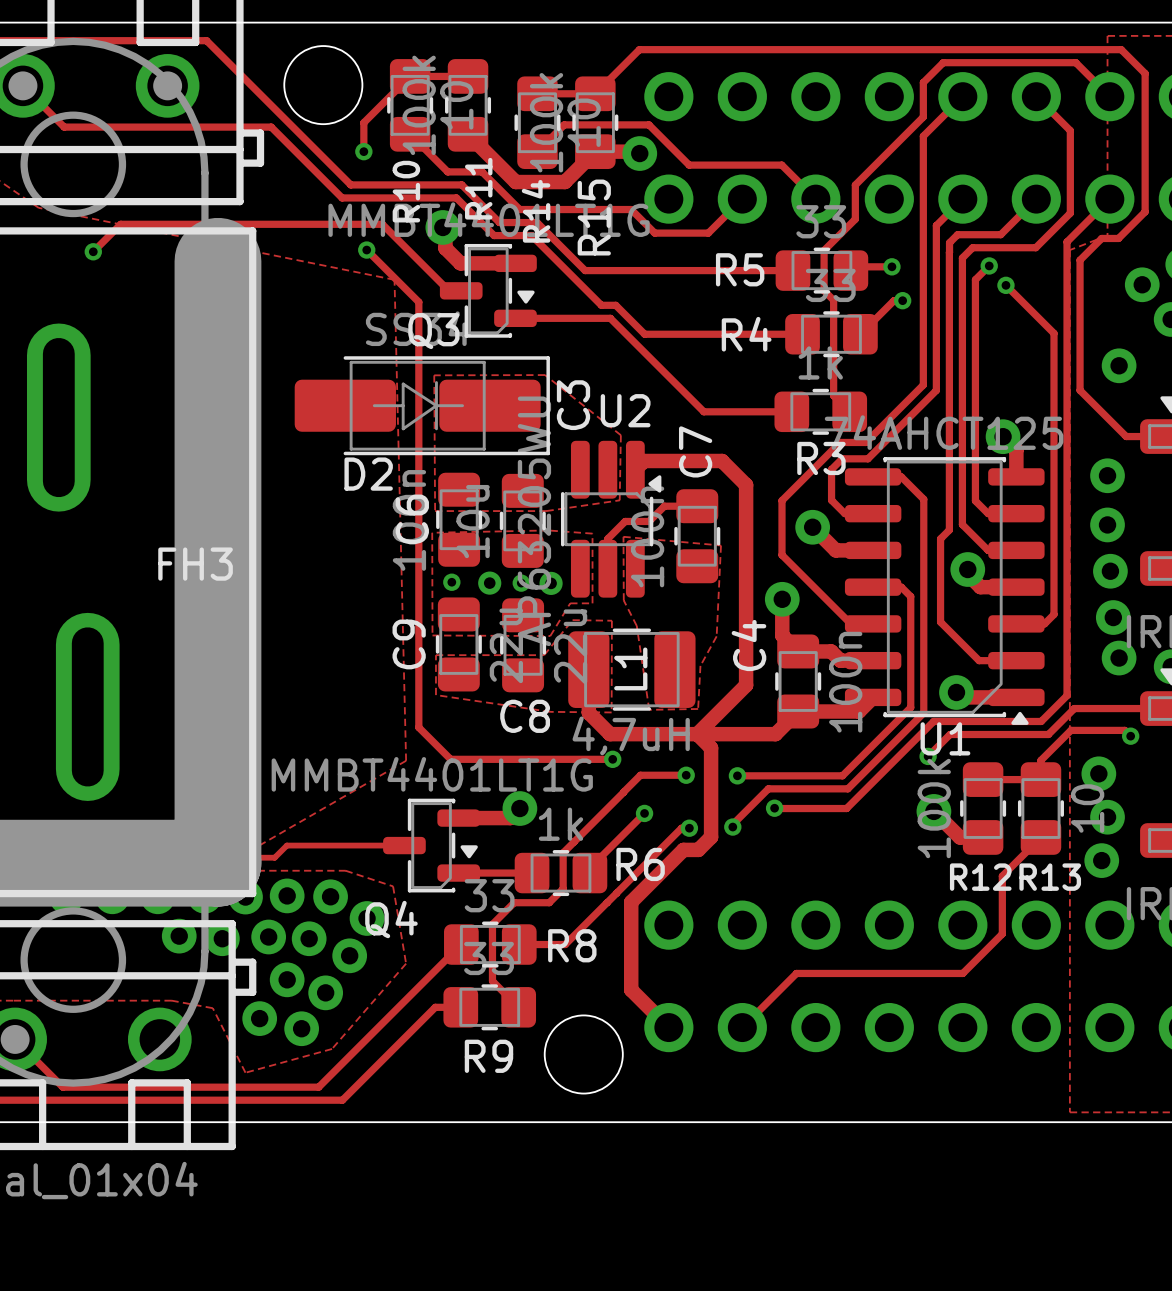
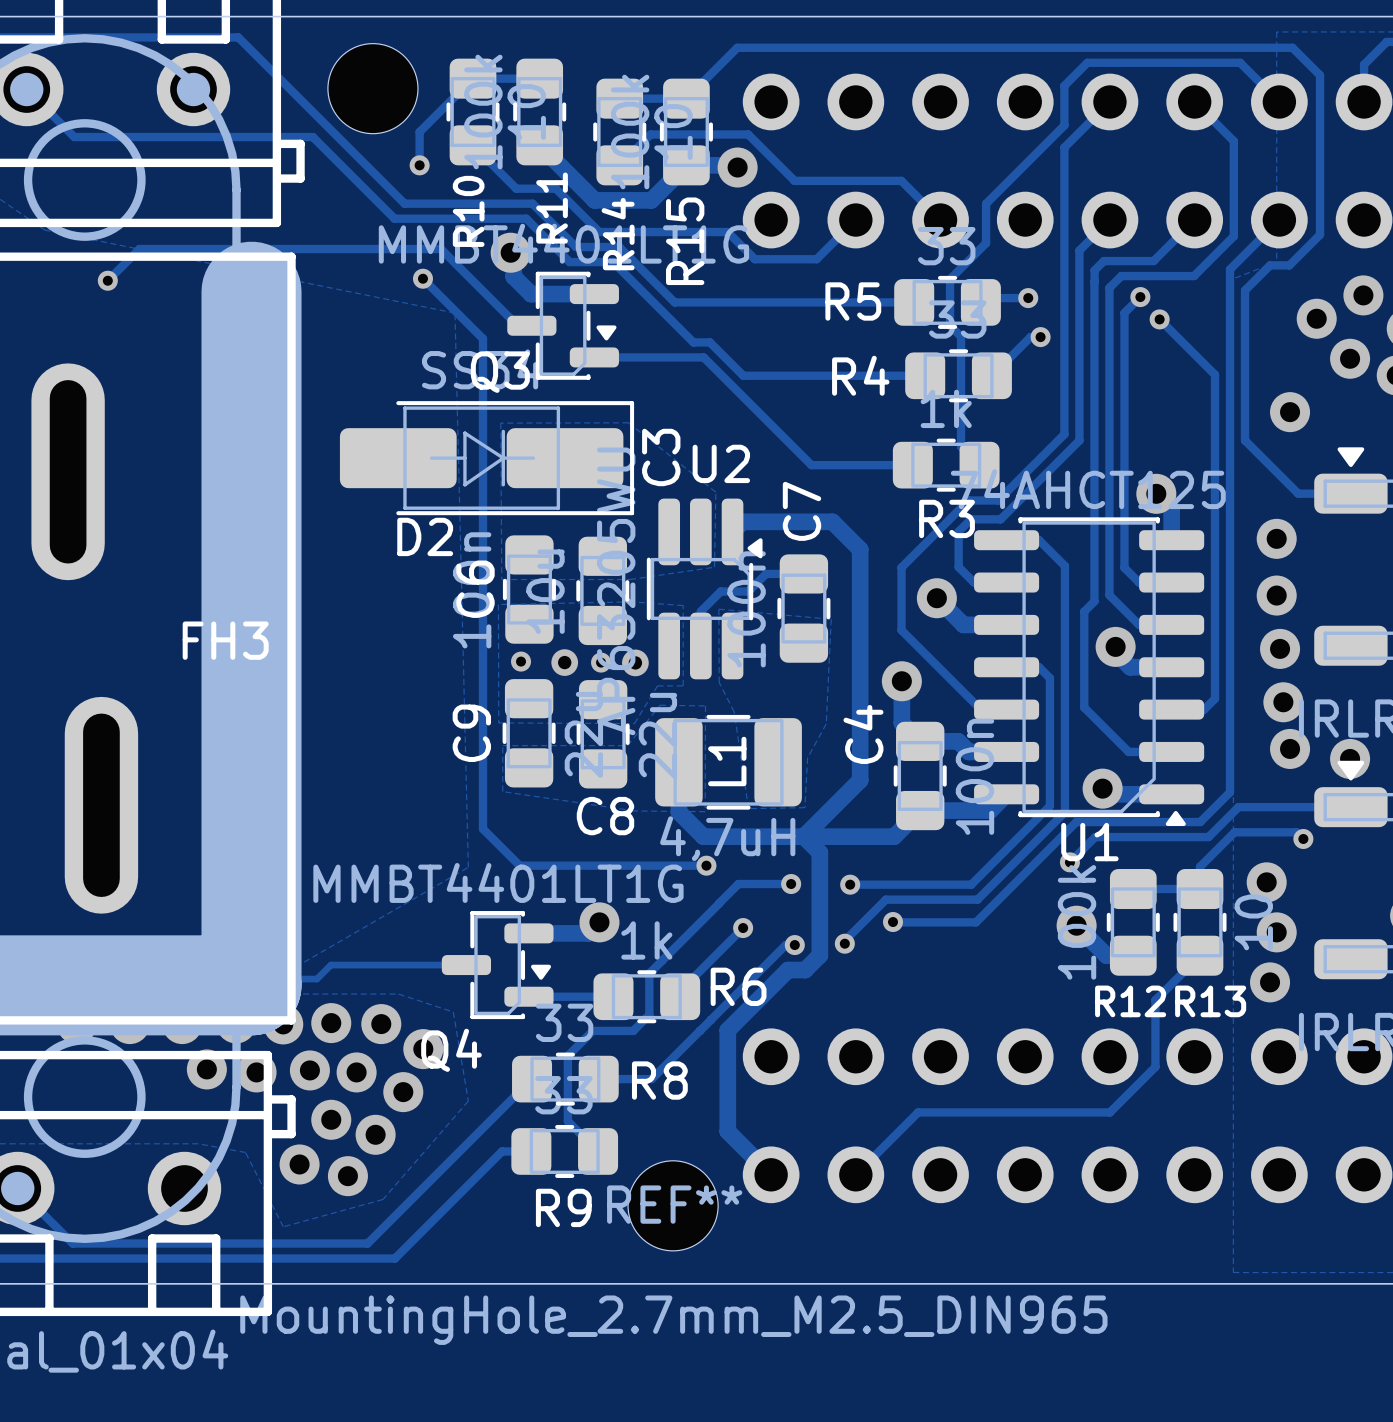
REF** name: none -> REF** (674, 1204)
REF** value: none -> MountingHole_2.7mm_M2.5_DIN965 (673, 1320)

